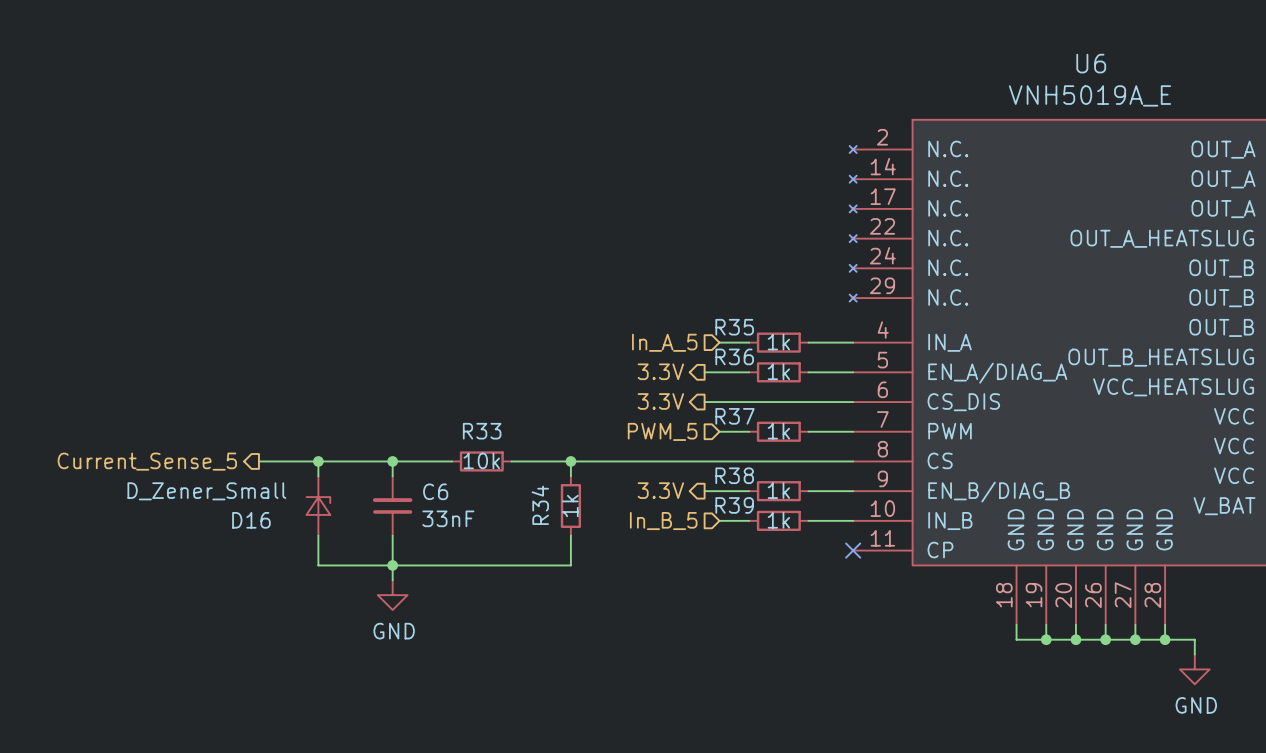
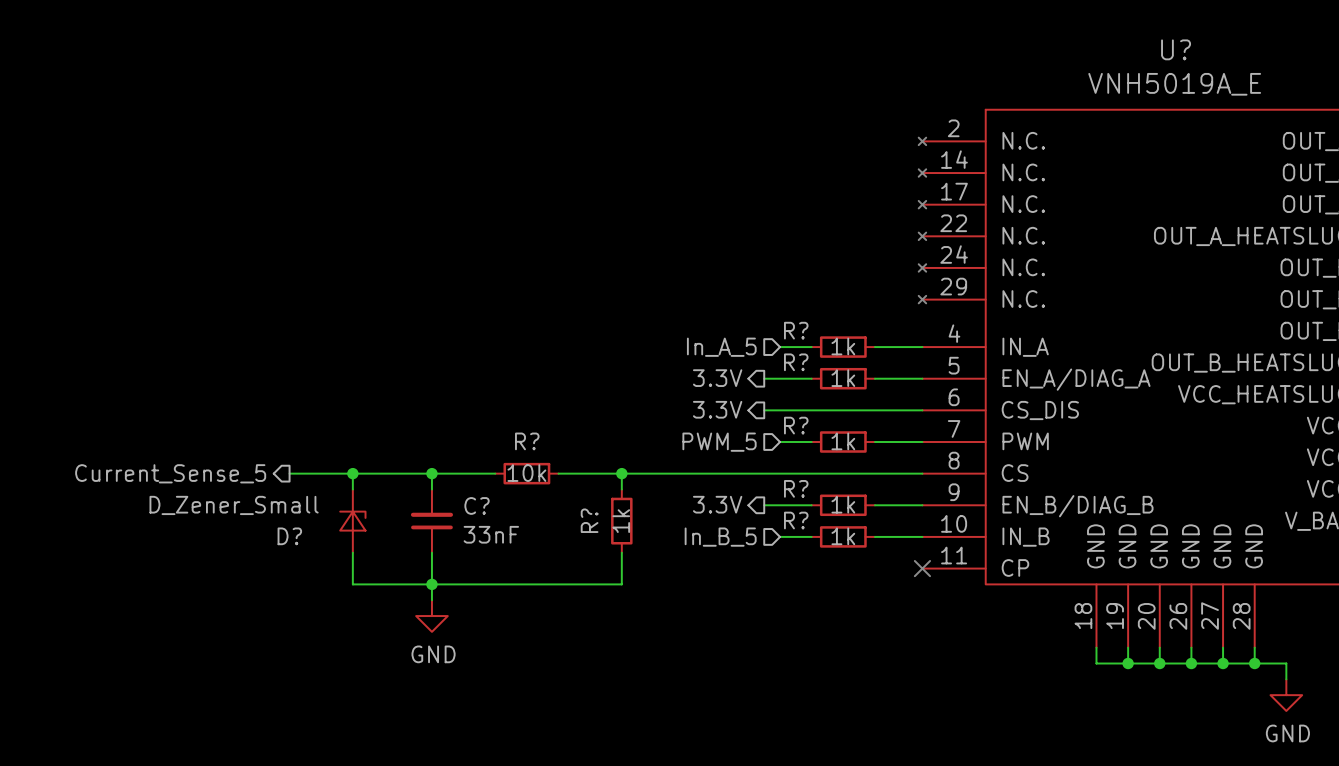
U6 name: U6 (1091, 63) -> U? (1176, 49)
R35 name: R35 (734, 327) -> R? (796, 330)
R36 name: R36 (734, 356) -> R? (796, 362)
R37 name: R37 (735, 416) -> R? (796, 425)
R33 name: R33 (482, 431) -> R? (527, 441)
R38 name: R38 (734, 475) -> R? (796, 488)
C6 name: C6 (435, 491) -> C? (477, 505)
R34 name: R34 (540, 505) -> R? (589, 520)
R39 name: R39 (734, 505) -> R? (796, 520)
D16 name: D16 (251, 520) -> D? (289, 536)

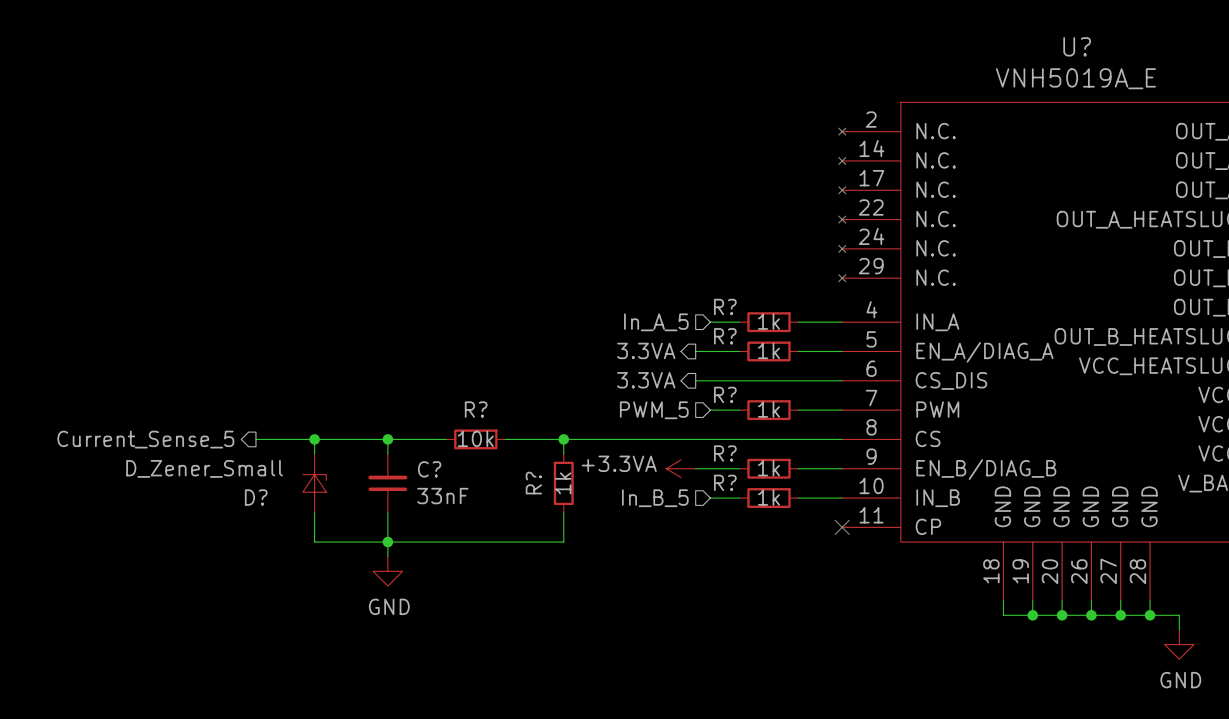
hierarchical label: 3.3V (717, 378) -> 3.3VA (646, 350)
hierarchical label: 3.3V (717, 409) -> 3.3VA (646, 380)
hierarchical label: 3.3V (717, 504) -> none
power symbol: none -> +3.3VA (681, 468)

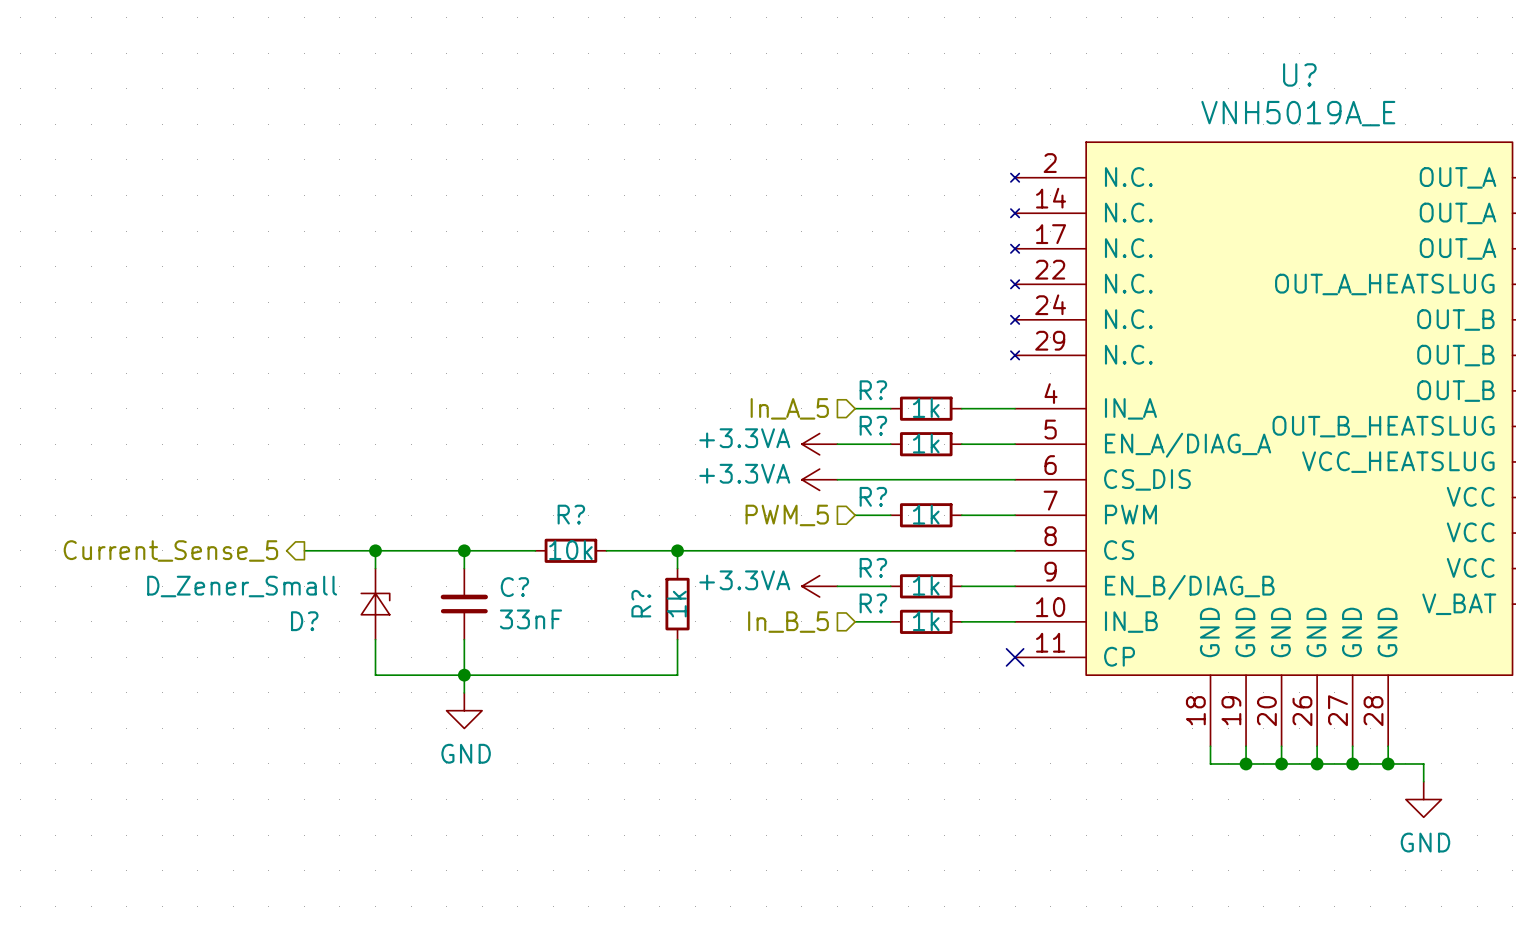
hierarchical label: 3.3VA (646, 350) -> none
power symbol: none -> +3.3VA (819, 444)
hierarchical label: 3.3VA (646, 380) -> none
power symbol: none -> +3.3VA (819, 479)

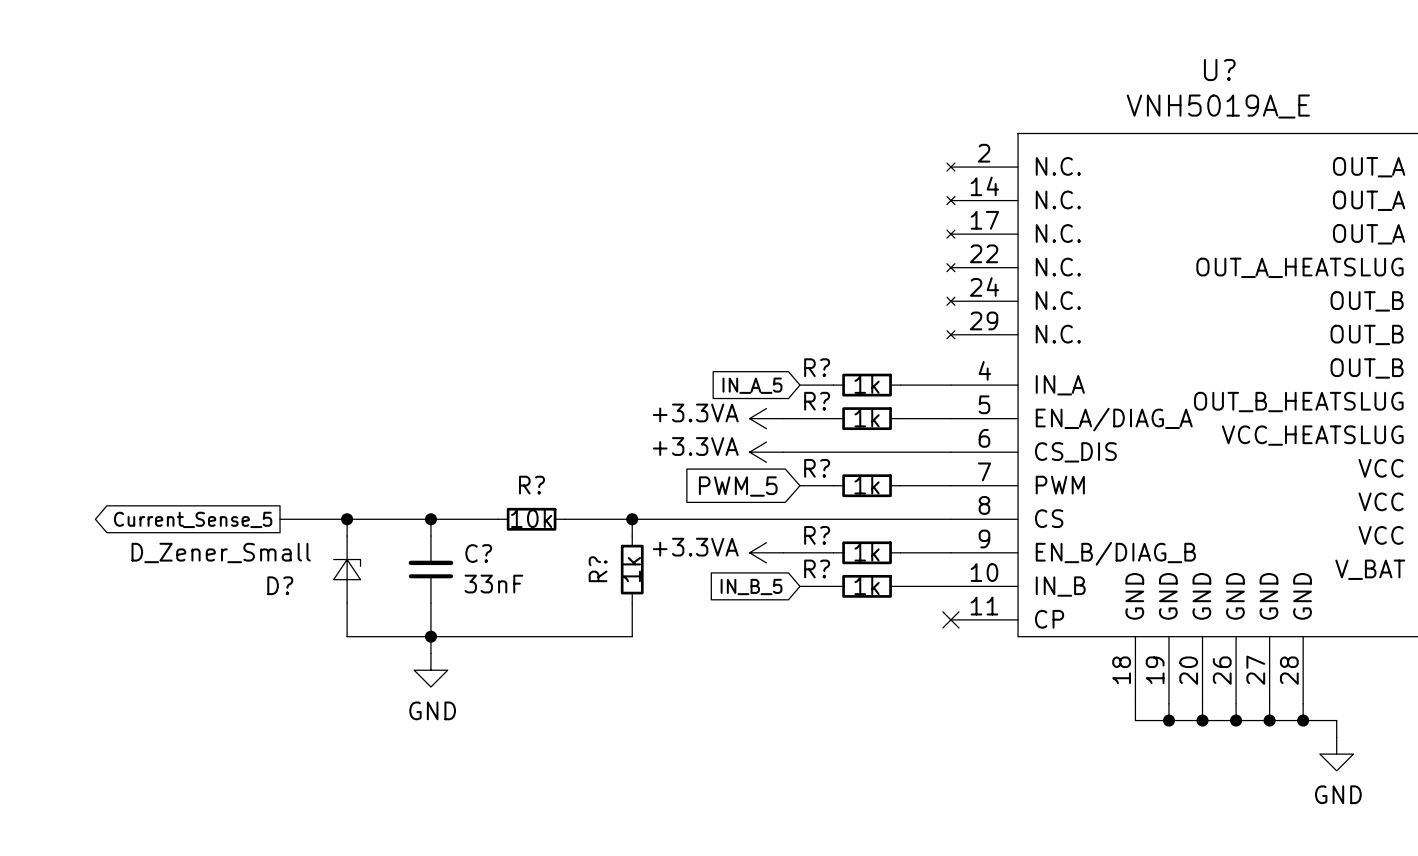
hierarchical label: In_A_5 (789, 408) -> none
global label: none -> IN_A_5 (752, 385)
hierarchical label: PWM_5 (787, 515) -> none
global label: none -> PWM_5 (738, 486)
hierarchical label: Current_Sense_5 (170, 550) -> none
global label: none -> Current_Sense_5 (193, 519)
hierarchical label: In_B_5 (788, 622) -> none
global label: none -> IN_B_5 (751, 586)

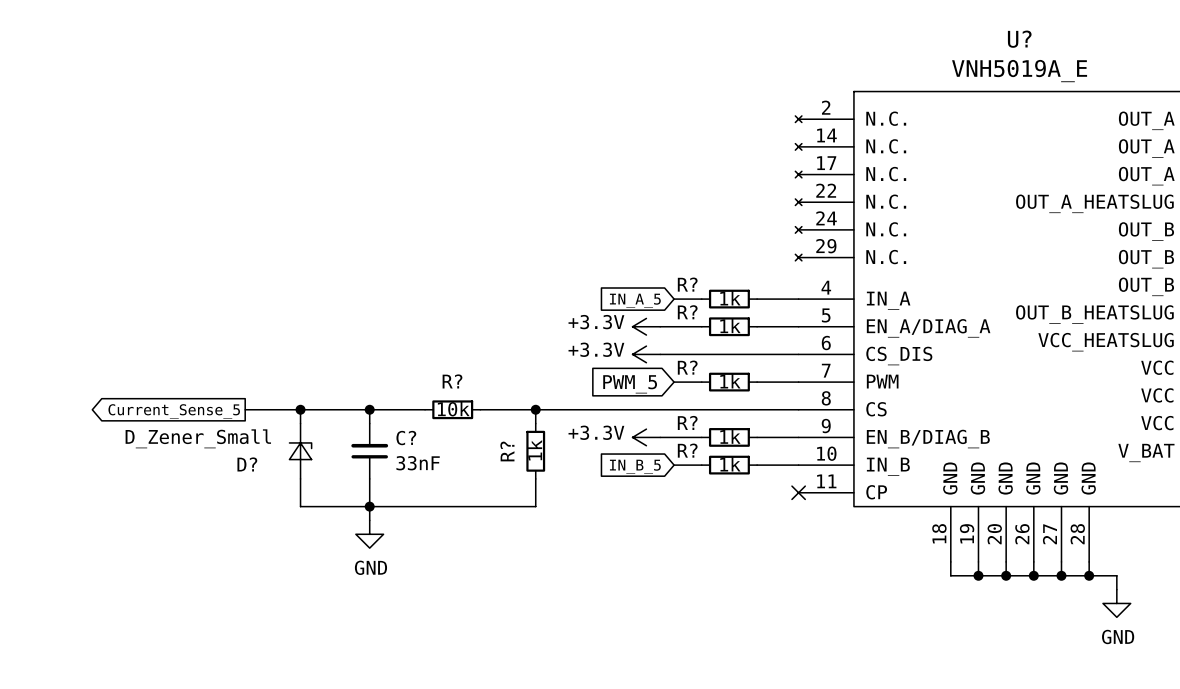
power symbol: +3.3VA (766, 418) -> +3.3V (646, 326)
power symbol: +3.3VA (766, 452) -> +3.3V (646, 354)
power symbol: +3.3VA (766, 552) -> +3.3V (646, 437)

